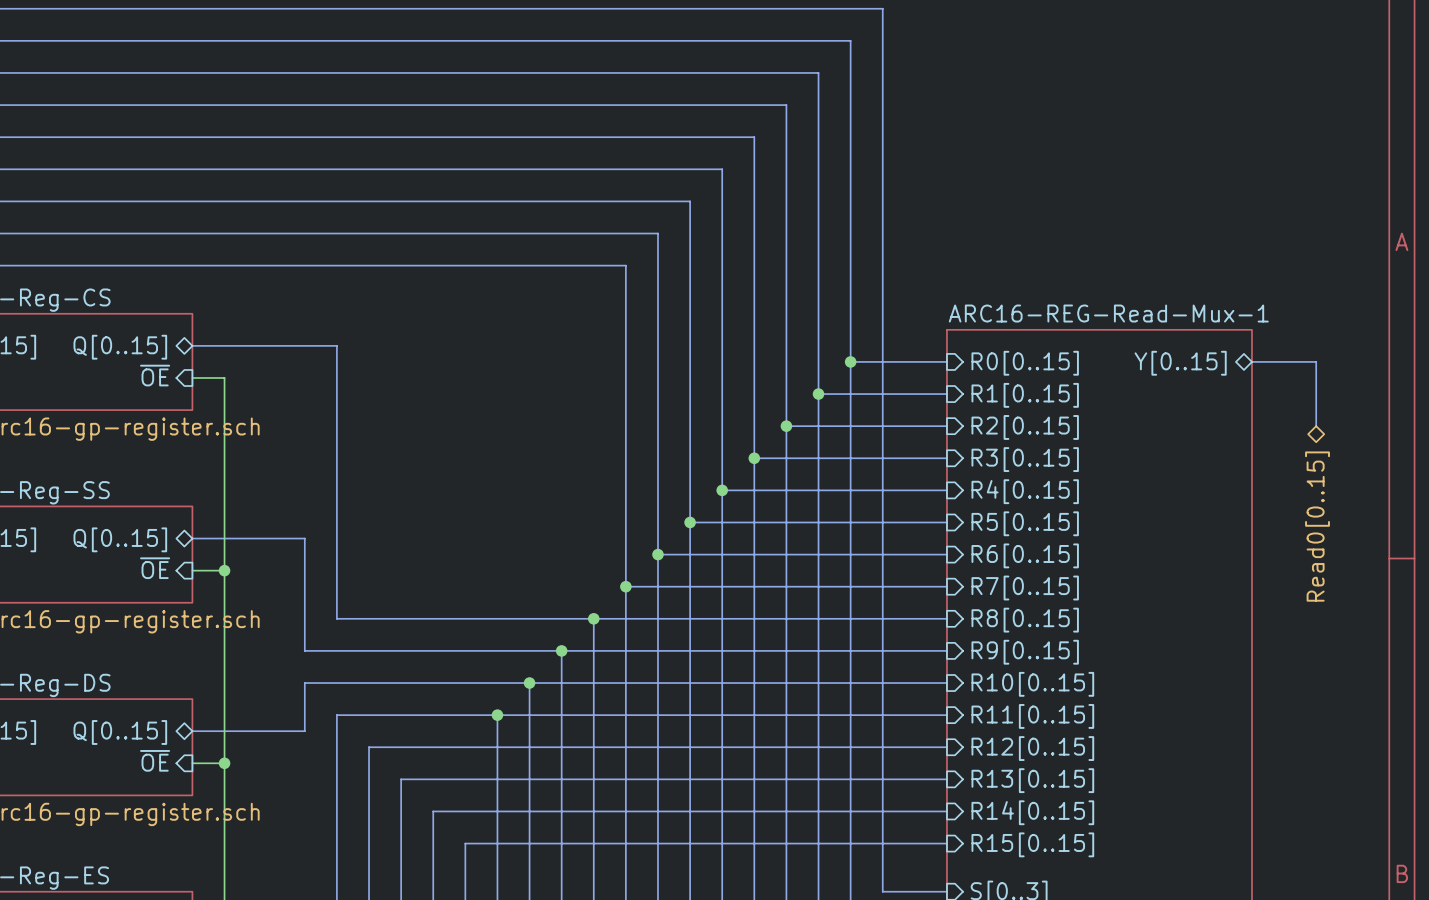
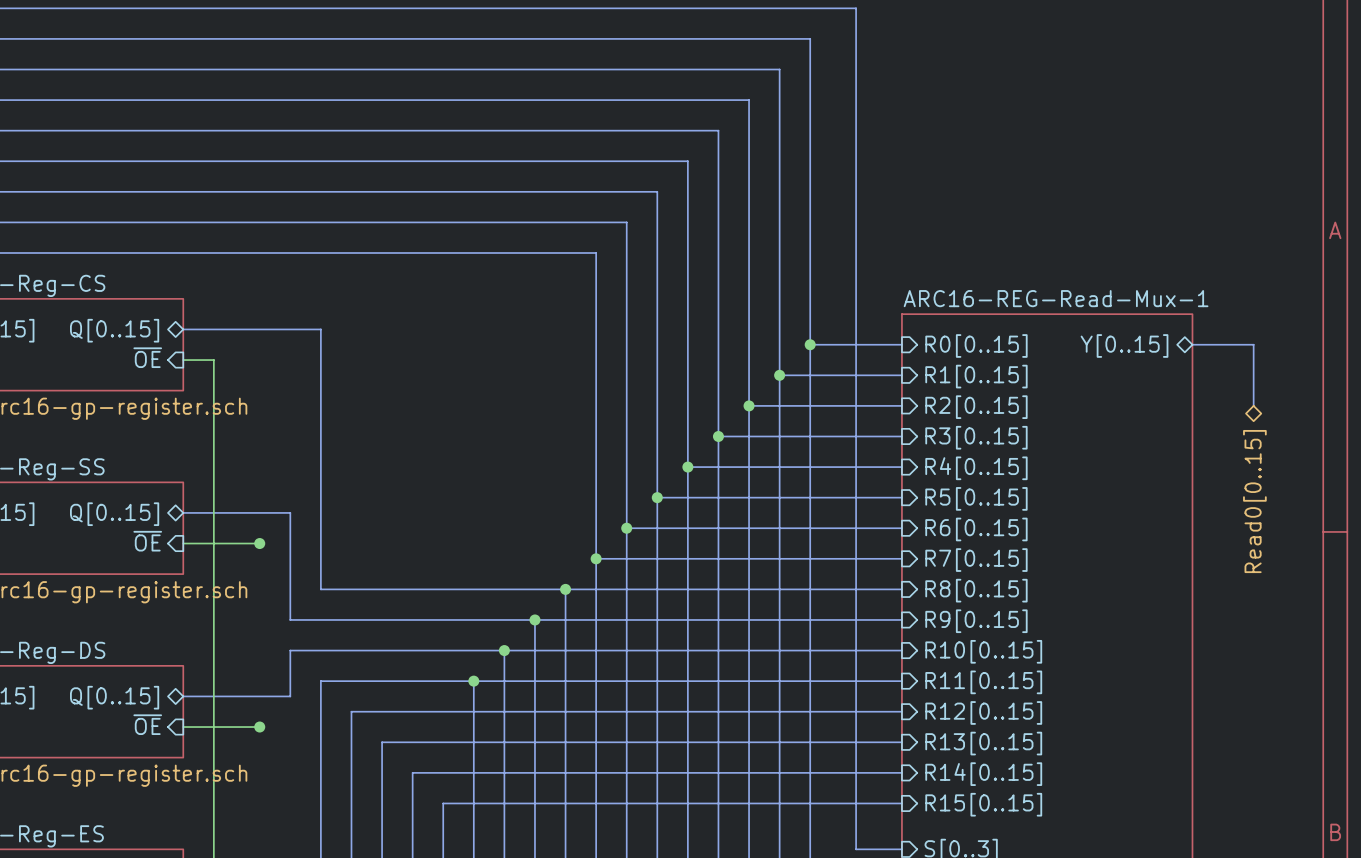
bus: (882, 8) (882, 891) (898, 891) -> (840, 8) (856, 8) (856, 849)
wire: none -> (213, 543) (259, 543)
junction position: (224, 570) -> (259, 543)
wire: none -> (213, 727) (259, 727)
junction position: (224, 763) -> (259, 727)

